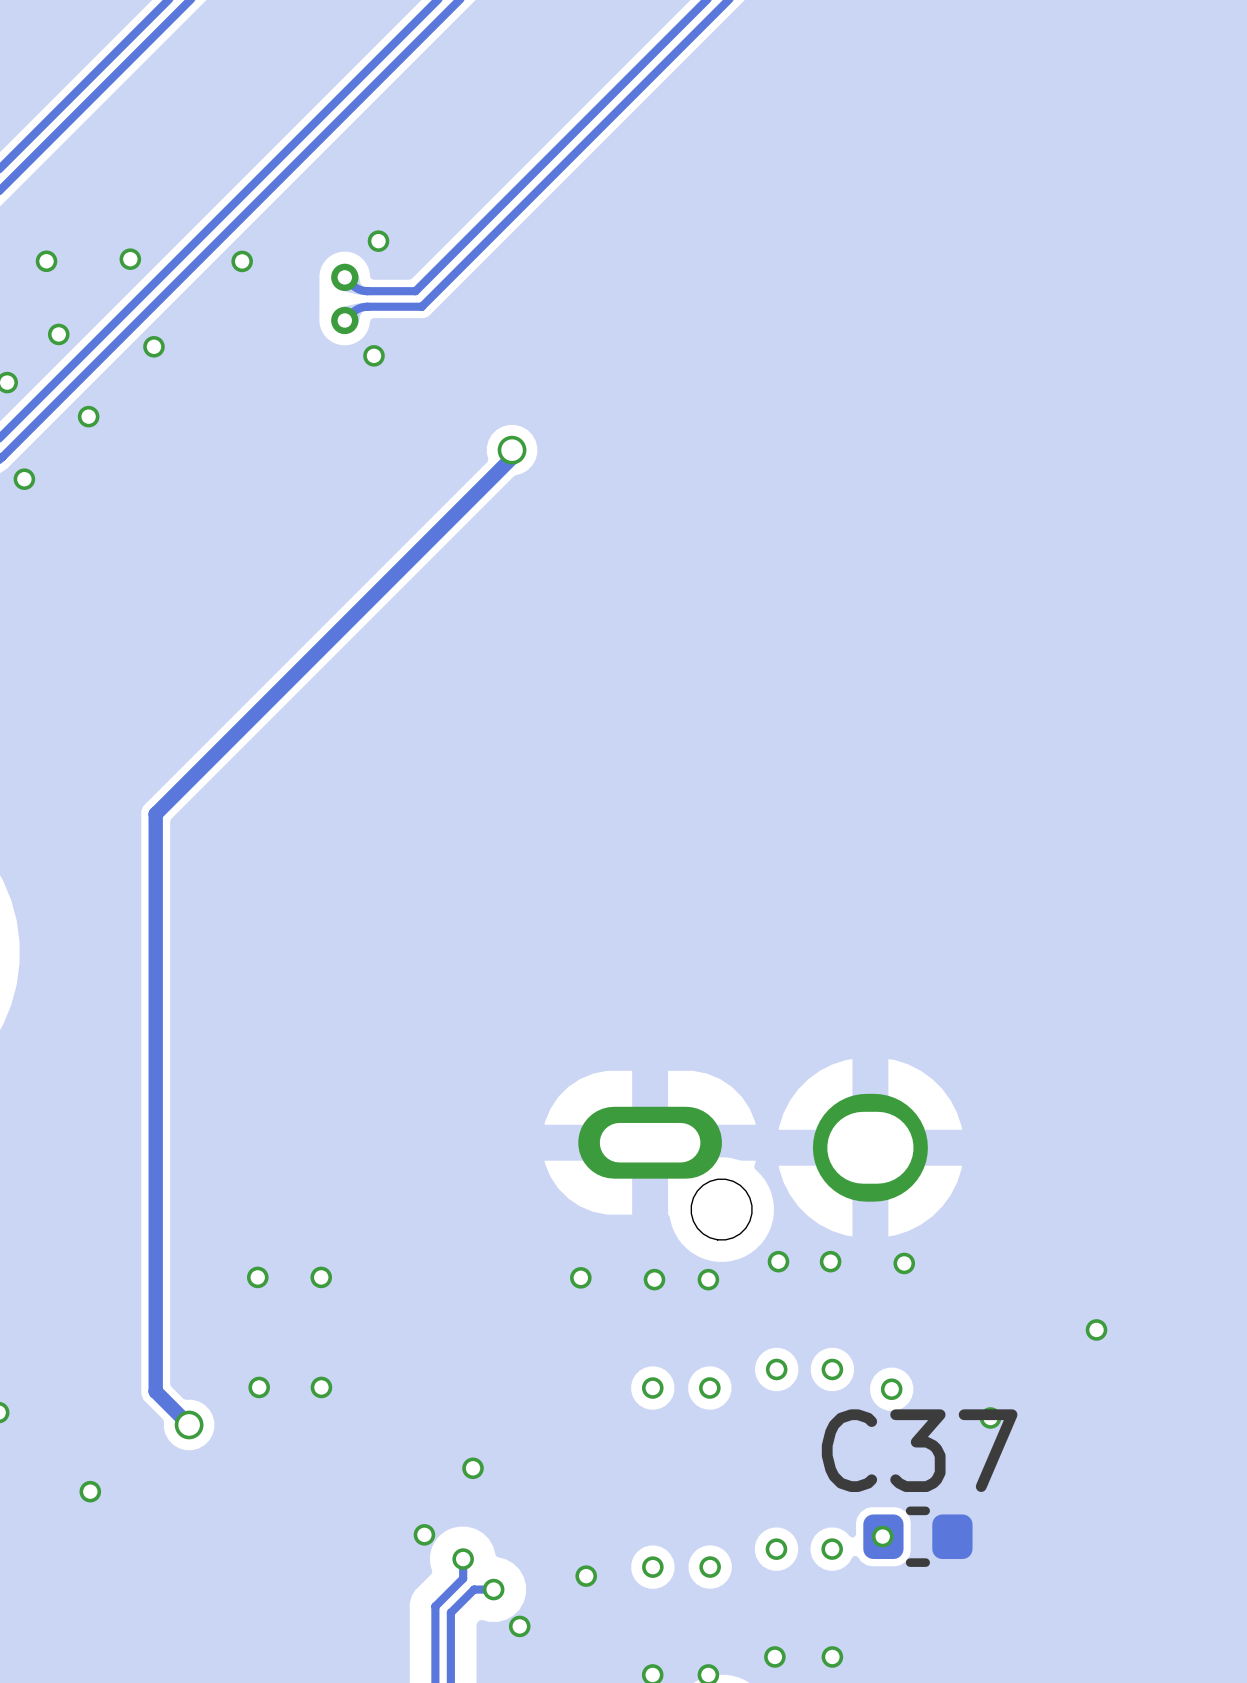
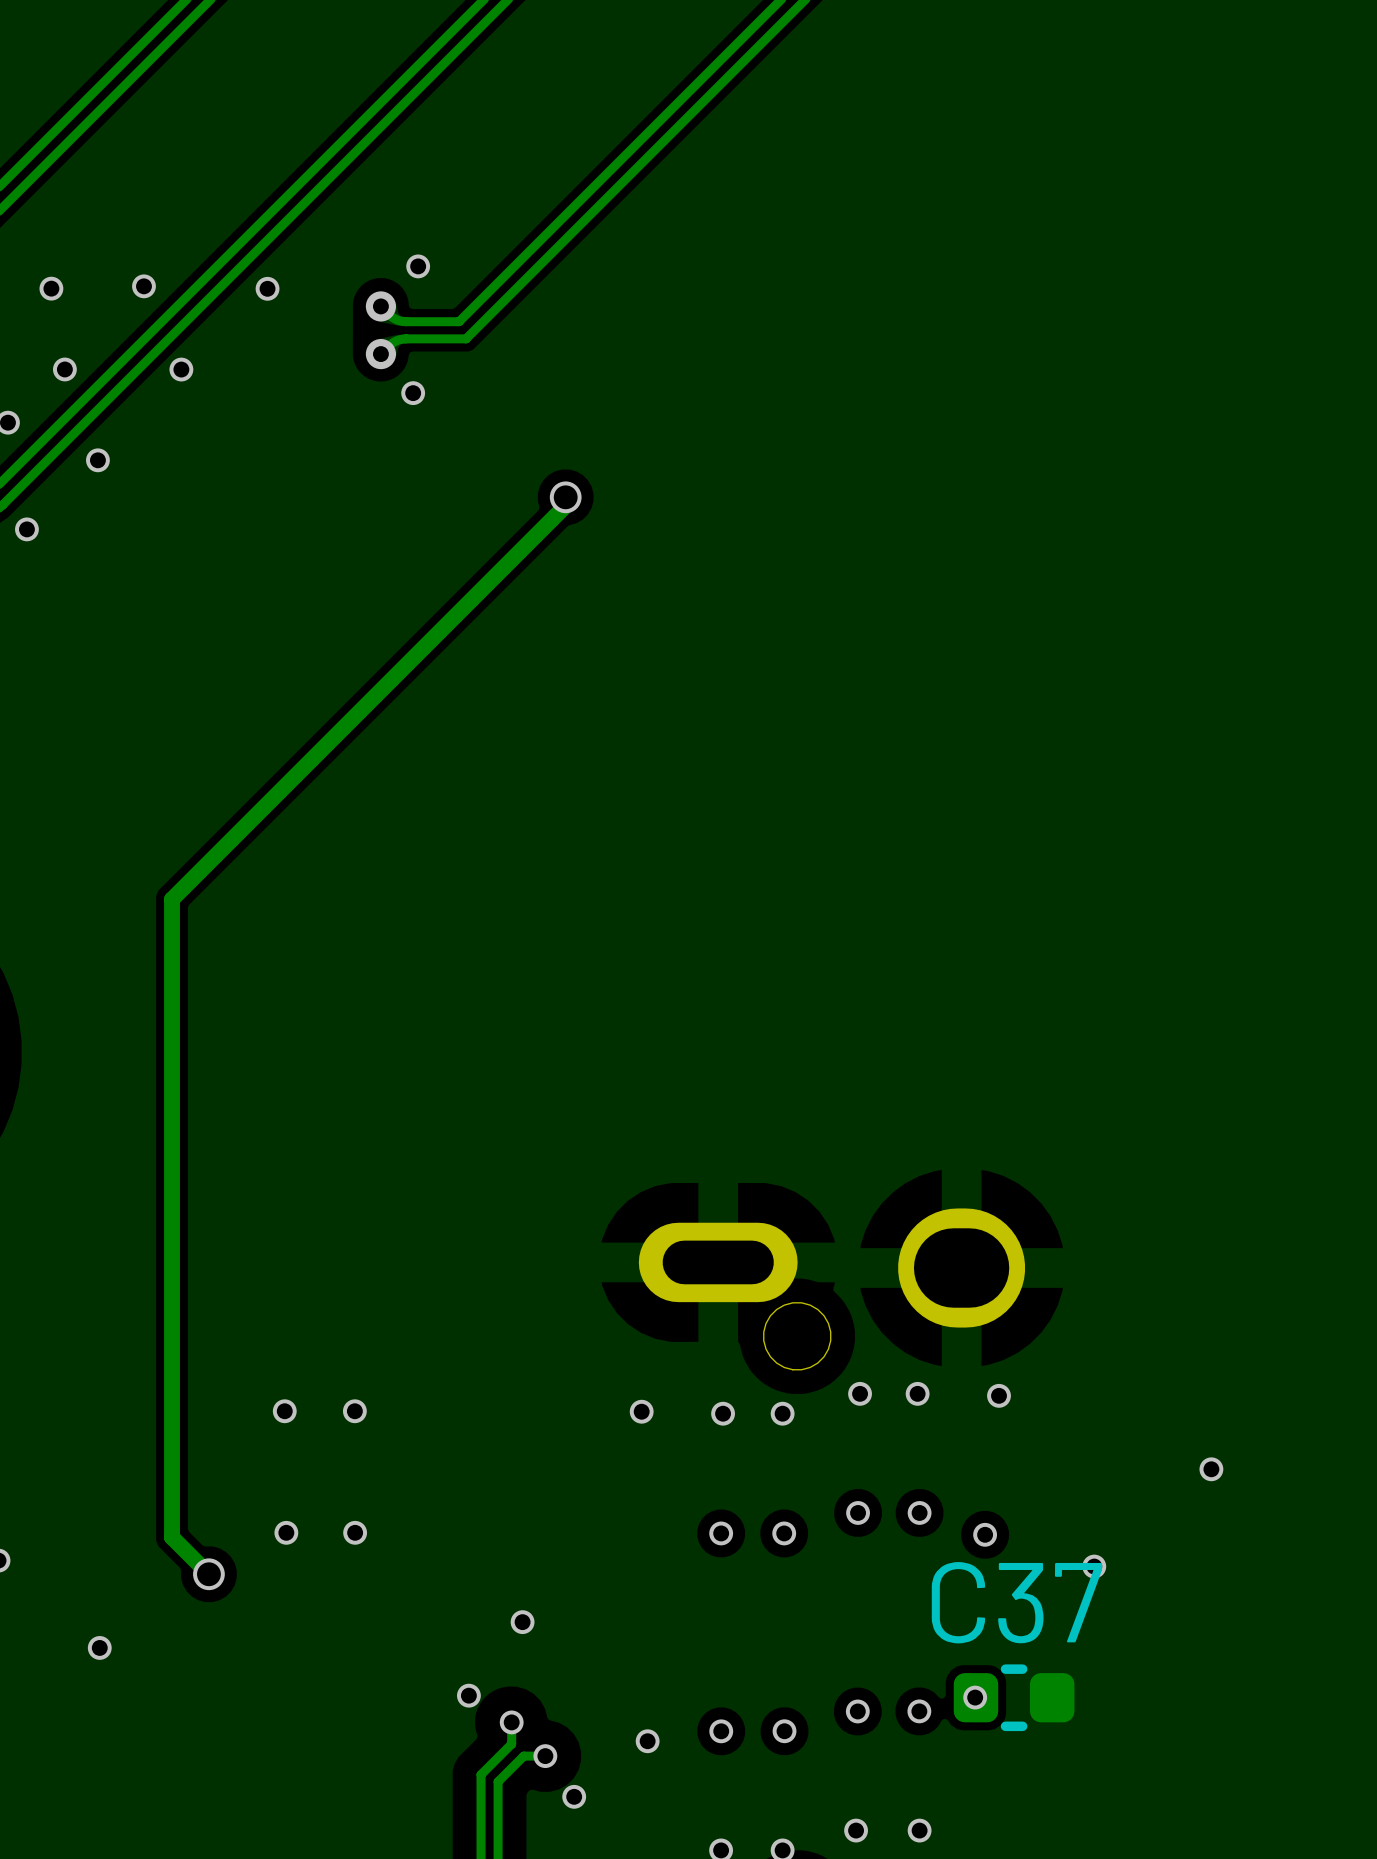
via position: (153, 346) -> (181, 369)

